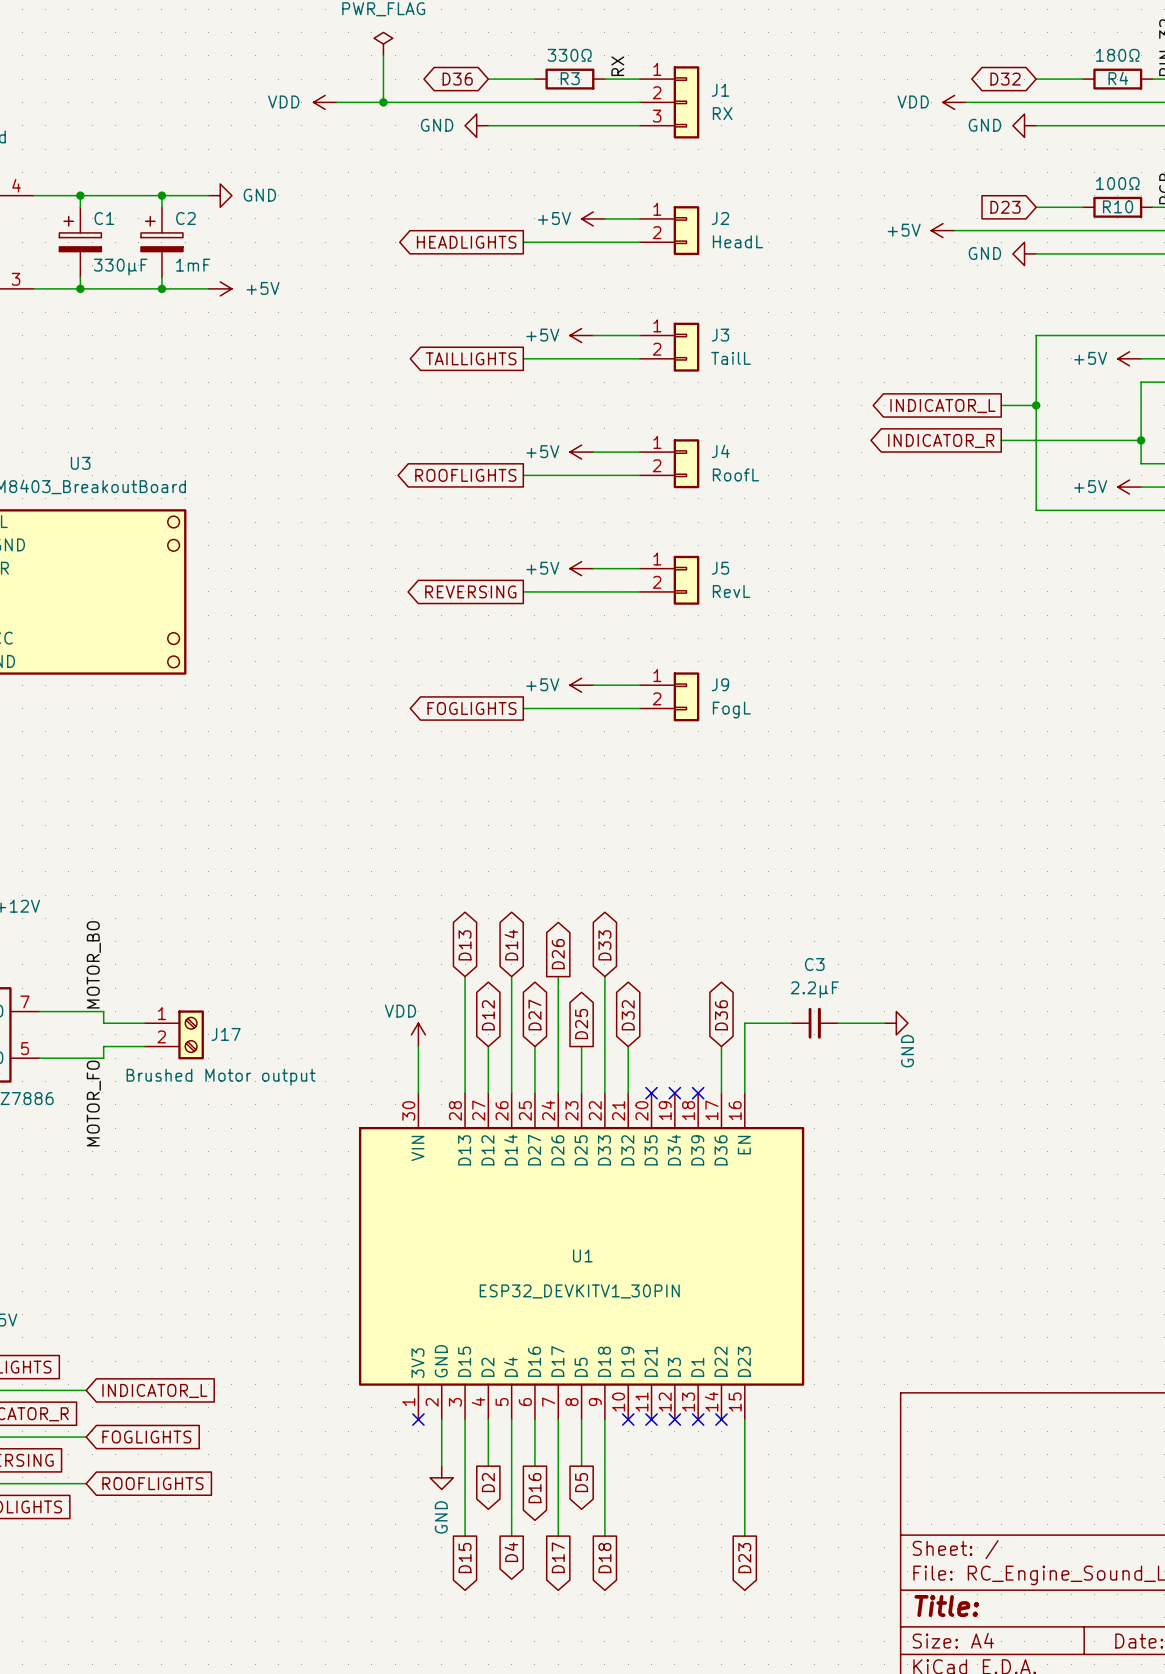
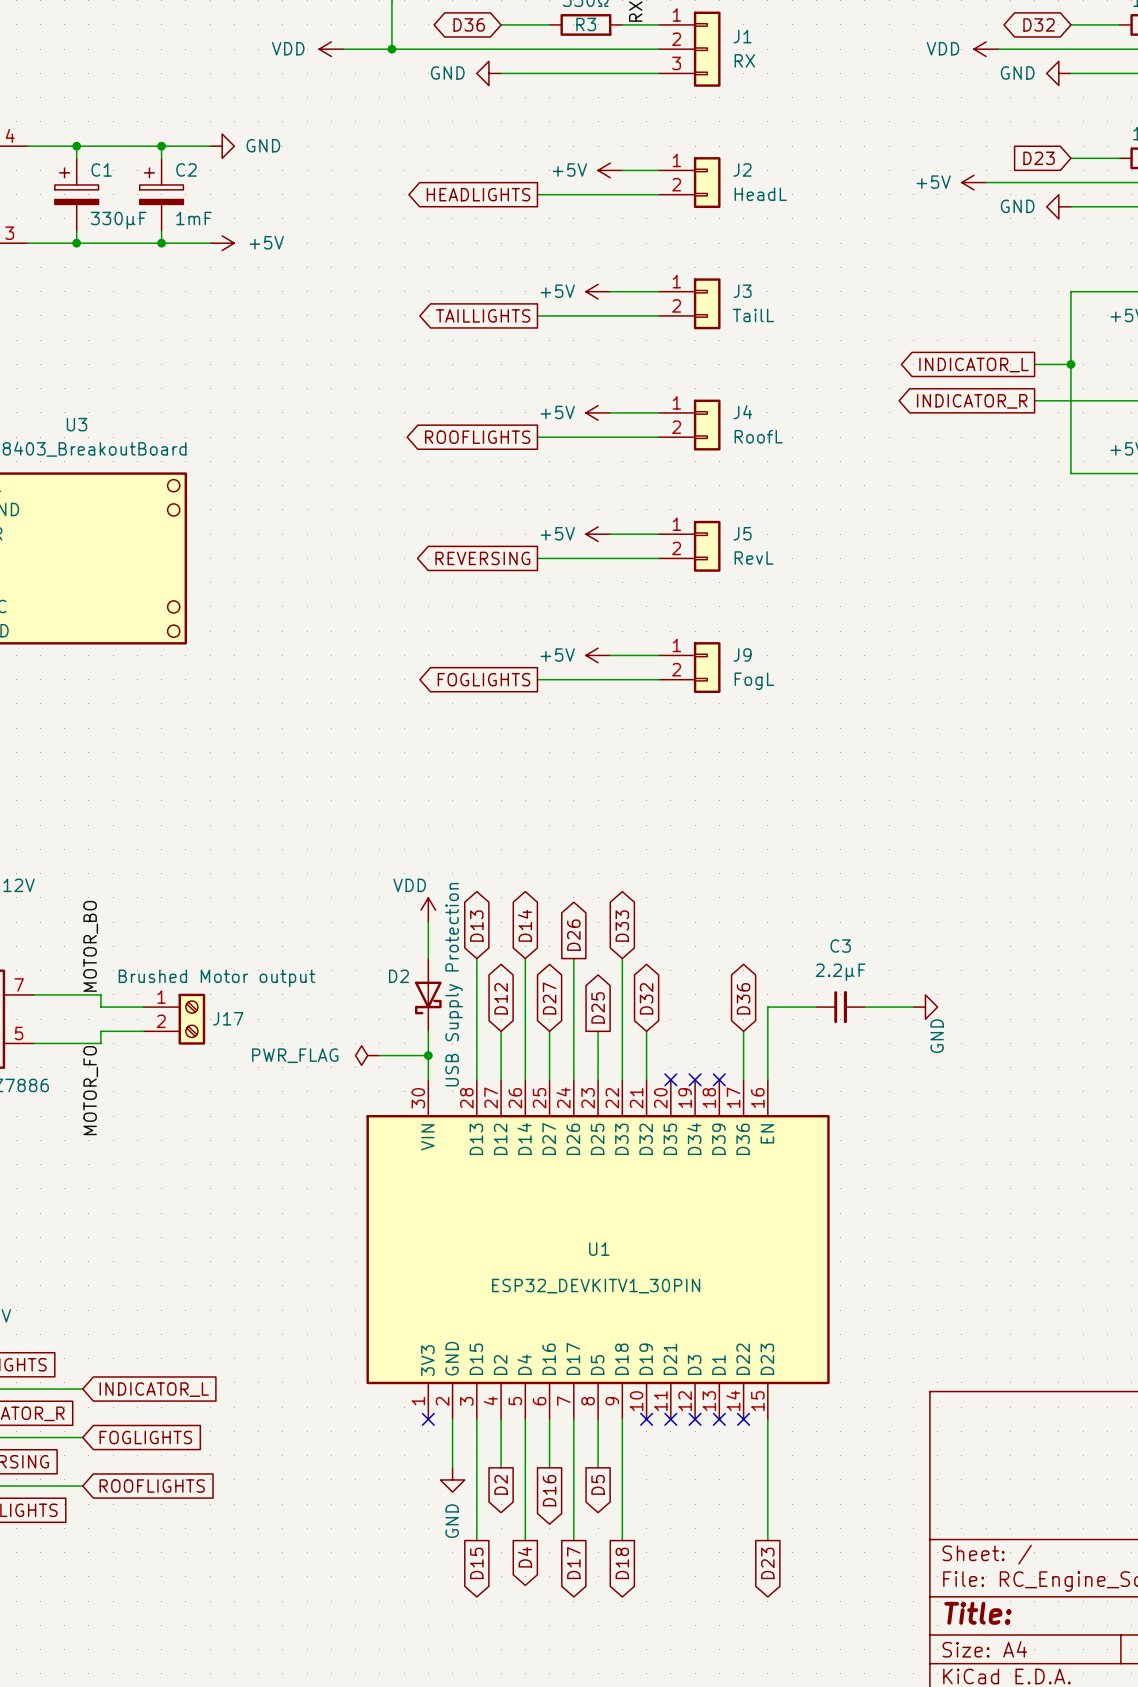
wire: none -> (428, 922) (428, 958)
D2: none -> USB Supply Protection (428, 994)
power symbol position: VDD (418, 1034) -> VDD (428, 910)
power symbol: none -> PWR_FLAG (367, 1055)
wire: none -> (379, 1055) (428, 1055)
junction: none -> (428, 1055)
J17 value position: Brushed Motor output (221, 1077) -> Brushed Motor output (217, 978)

